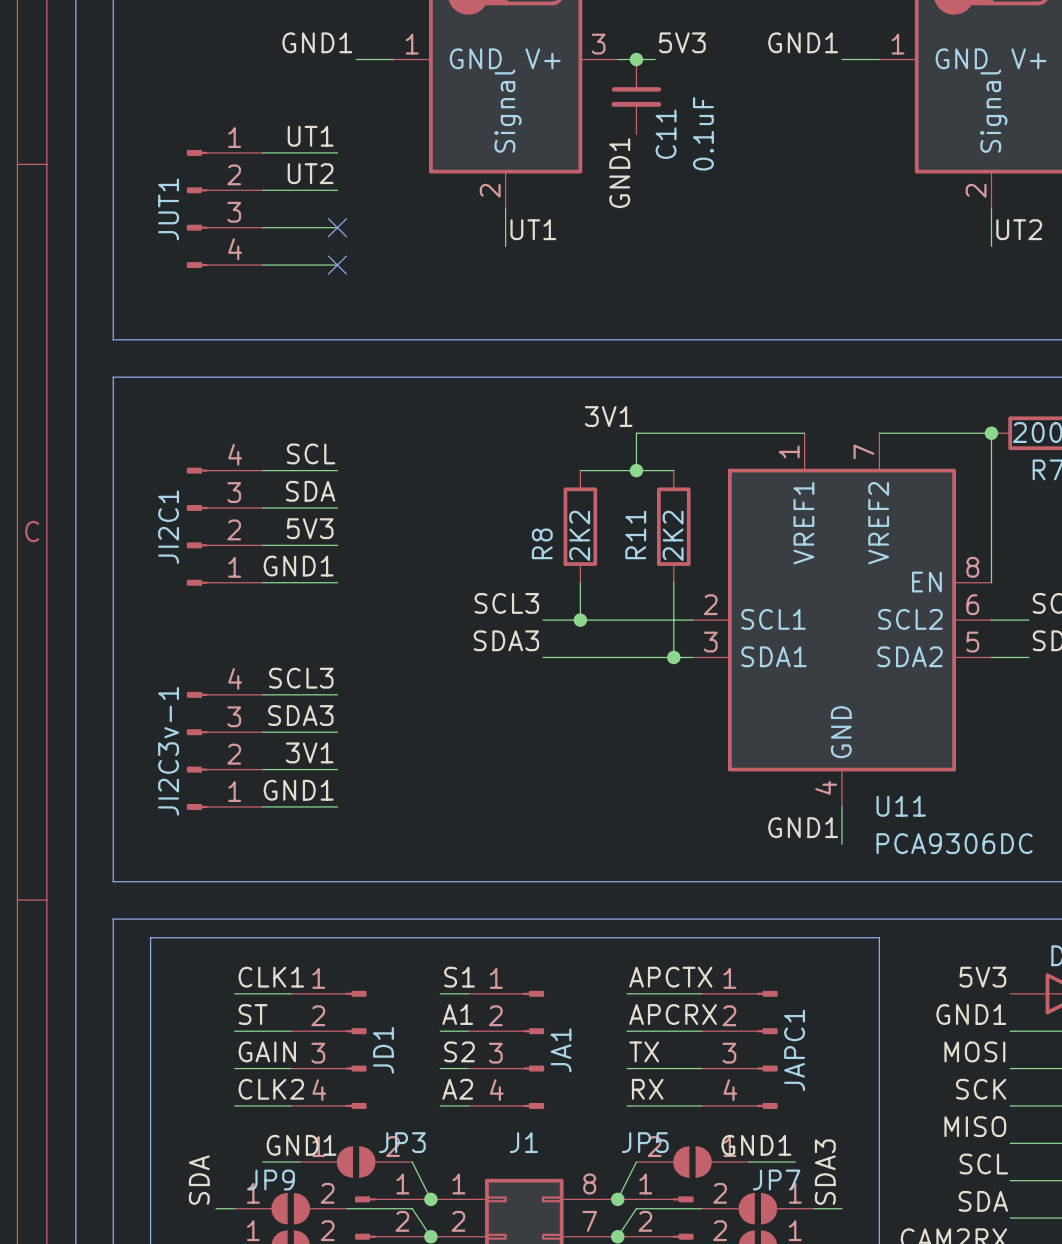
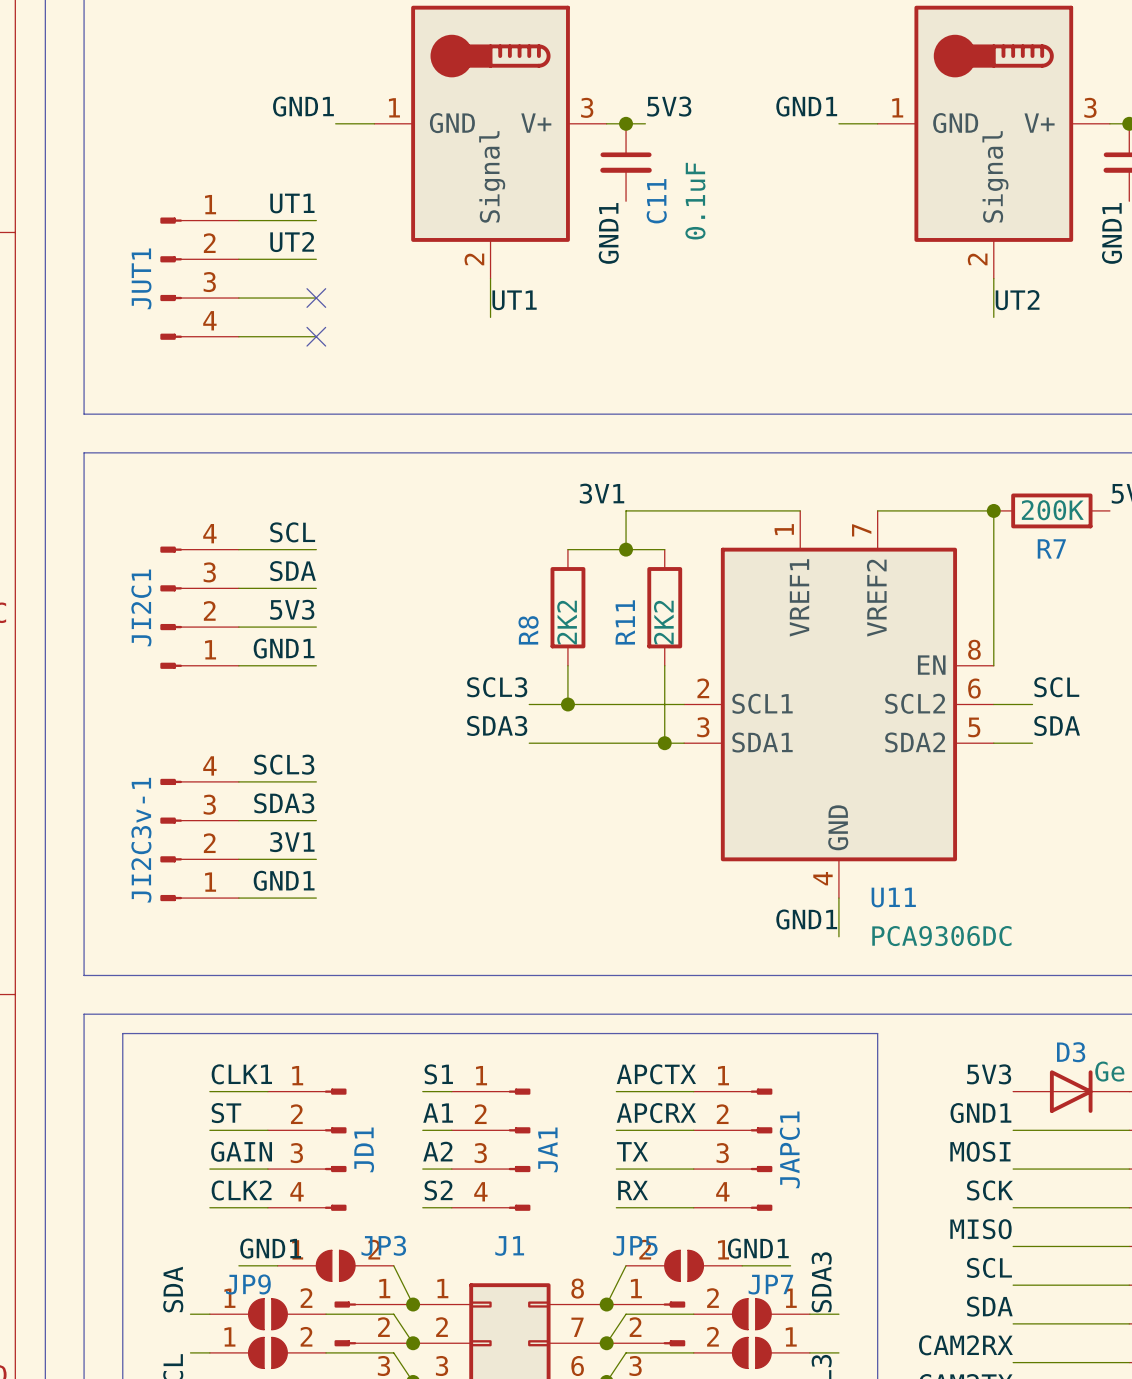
label: S2 (459, 1051) -> A2 (437, 1151)
label: A2 (457, 1089) -> S2 (438, 1190)

